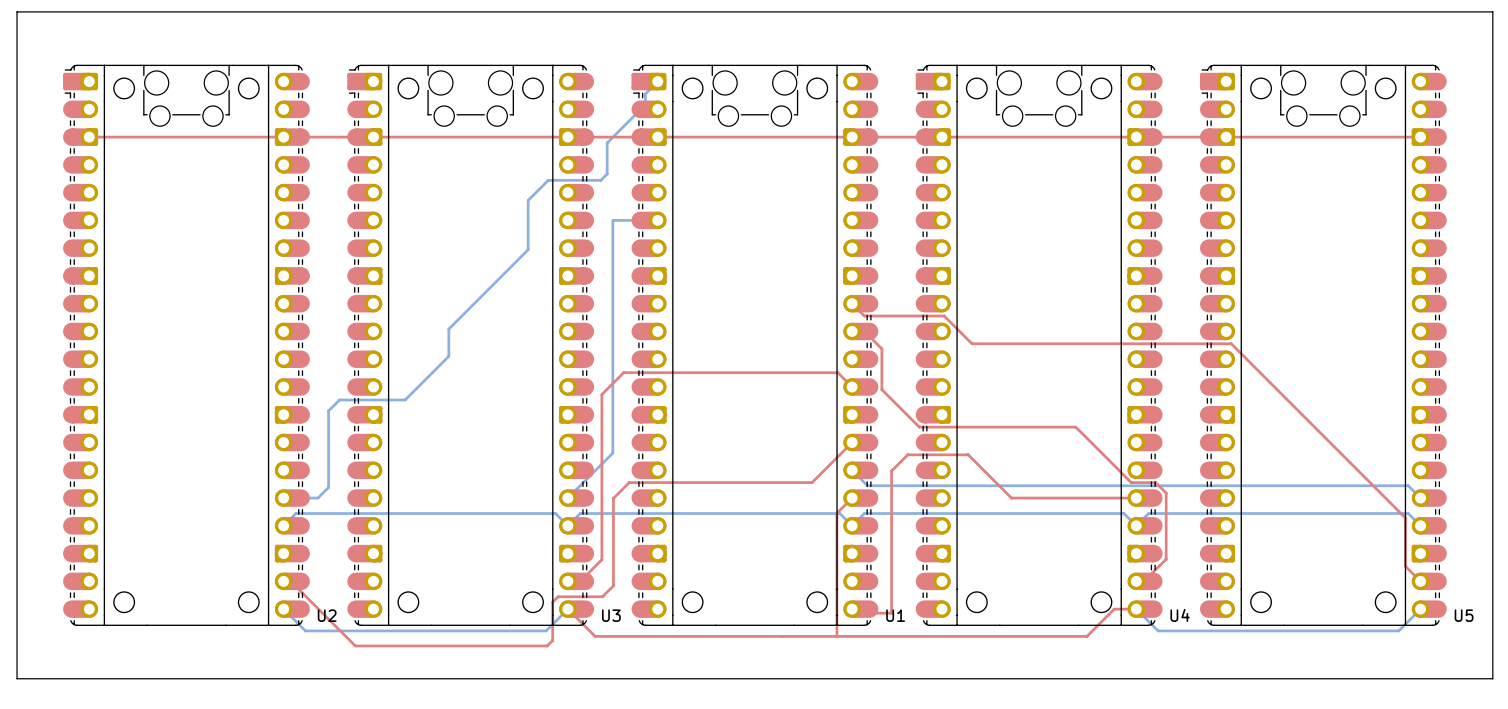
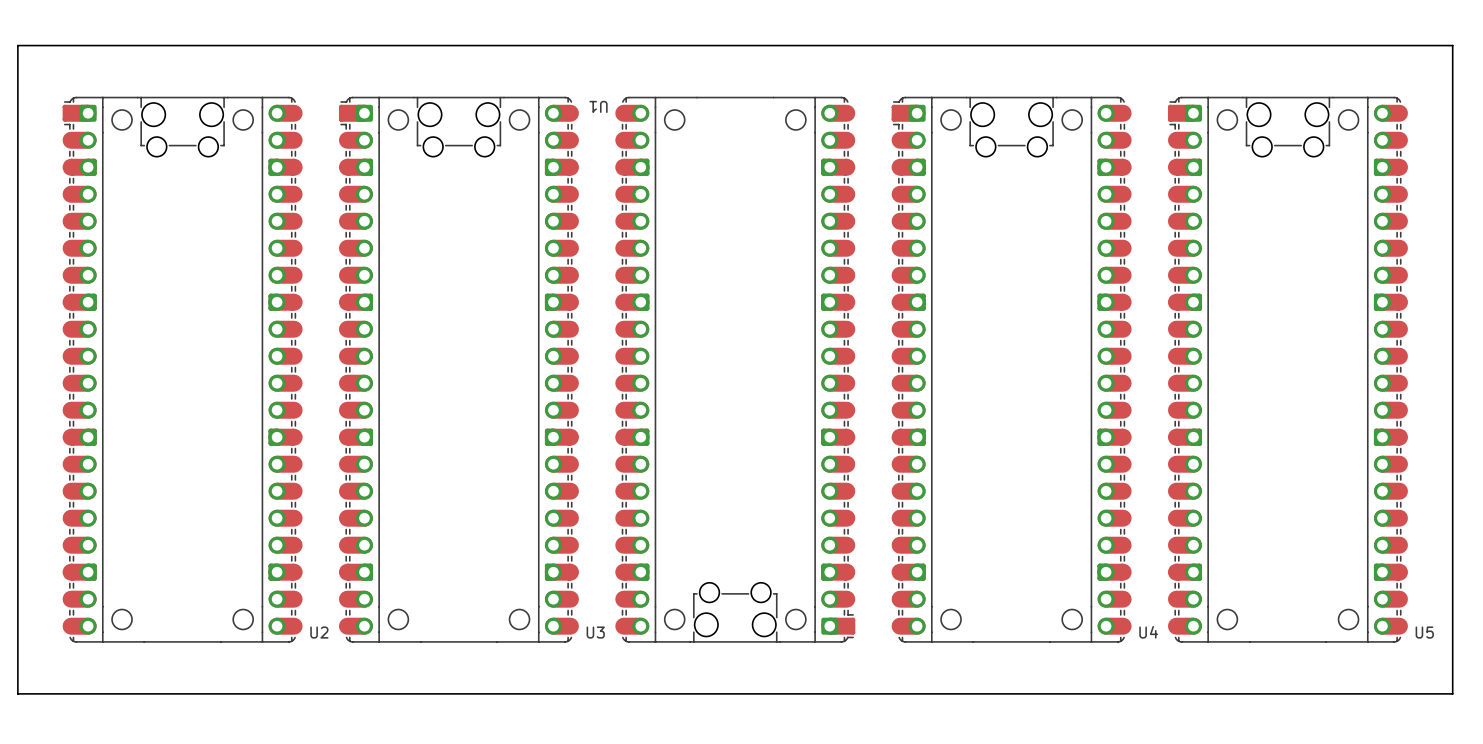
bottom track: (657, 81) (645, 93) (645, 104) (607, 142) (607, 173) (600, 180) (548, 180) (528, 200) (528, 249) (448, 329) (448, 356) (405, 400) (339, 400) (328, 410) (328, 487) (317, 498) (283, 498) -> none
top track: (89, 137) (1420, 137) -> none
bottom track: (657, 220) (612, 221) (612, 453) (567, 498) -> none
top track: (852, 303) (864, 315) (944, 315) (971, 343) (1231, 343) (1405, 517) (1405, 566) (1420, 581) -> none
top track: (852, 331) (864, 331) (881, 348) (881, 389) (919, 427) (1075, 427) (1131, 482) (1155, 482) (1166, 493) (1166, 559) (1143, 581) (1136, 581) -> none
U1 rotation: 0° (754, 345) -> 180° (735, 369)
top track: (852, 386) (837, 372) (623, 372) (601, 394) (601, 559) (580, 581) (567, 581) -> none
top track: (852, 442) (812, 482) (629, 482) (613, 498) (613, 585) (602, 596) (558, 596) (552, 602) (552, 640) (547, 645) (355, 645) (290, 581) (283, 581) -> none
bottom track: (852, 470) (867, 485) (1408, 485) (1420, 498) -> none
top track: (852, 498) (836, 513) (836, 636) -> none
top track: (1136, 498) (1011, 498) (968, 454) (907, 454) (891, 471) (891, 613) (856, 613) (852, 609) (861, 609) -> none
bottom track: (283, 525) (295, 513) (555, 513) (567, 525) (580, 513) (839, 513) (852, 525) (864, 513) (1124, 513) (1136, 525) (1148, 513) (1408, 513) (1420, 525) -> none
bottom track: (283, 609) (305, 630) (546, 630) (567, 609) -> none
top track: (567, 609) (595, 636) (1086, 636) (1114, 609) (1136, 609) -> none
bottom track: (1136, 609) (1158, 630) (1398, 630) (1420, 609) -> none

